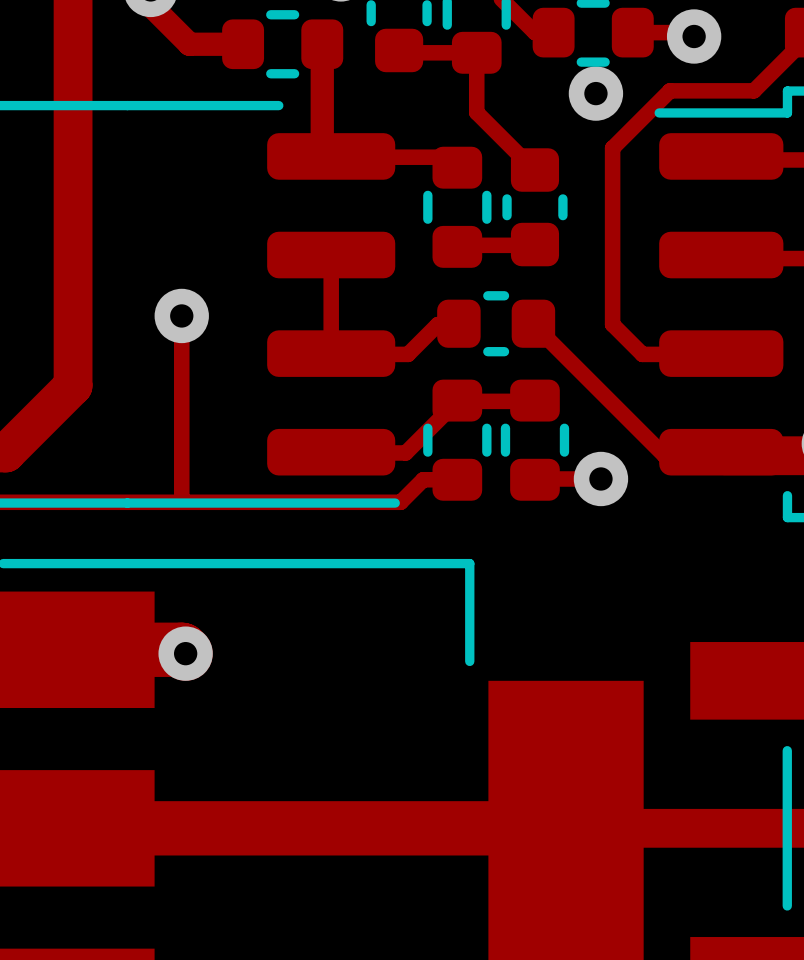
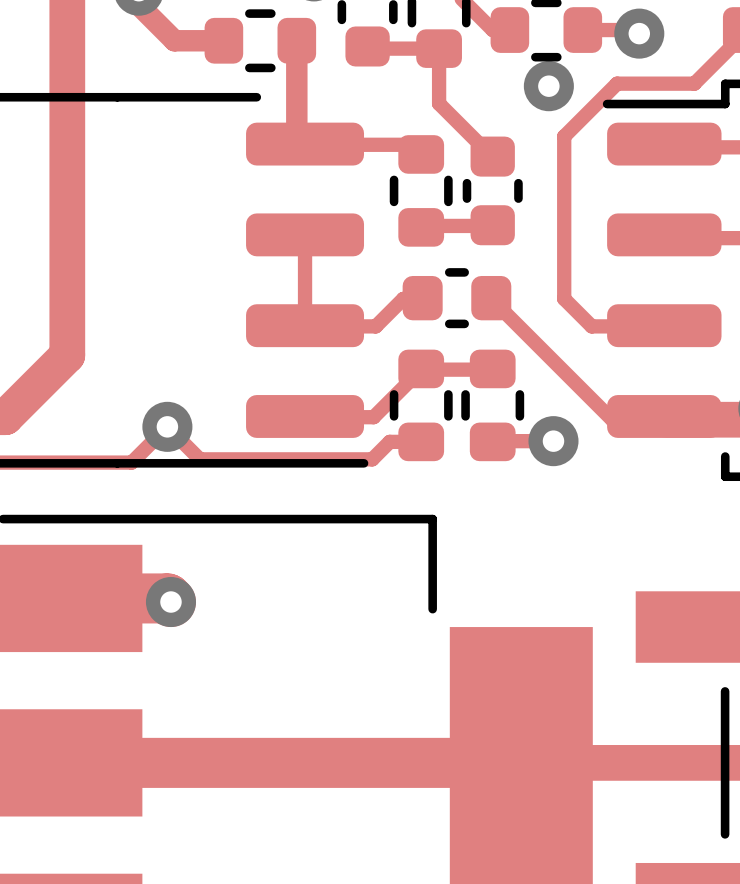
track: (181, 315) (181, 502) -> none
via position: (181, 315) -> (167, 426)
track: (404, 498) (400, 502) (142, 502) -> (372, 459) (199, 459) (167, 426) (131, 462)

